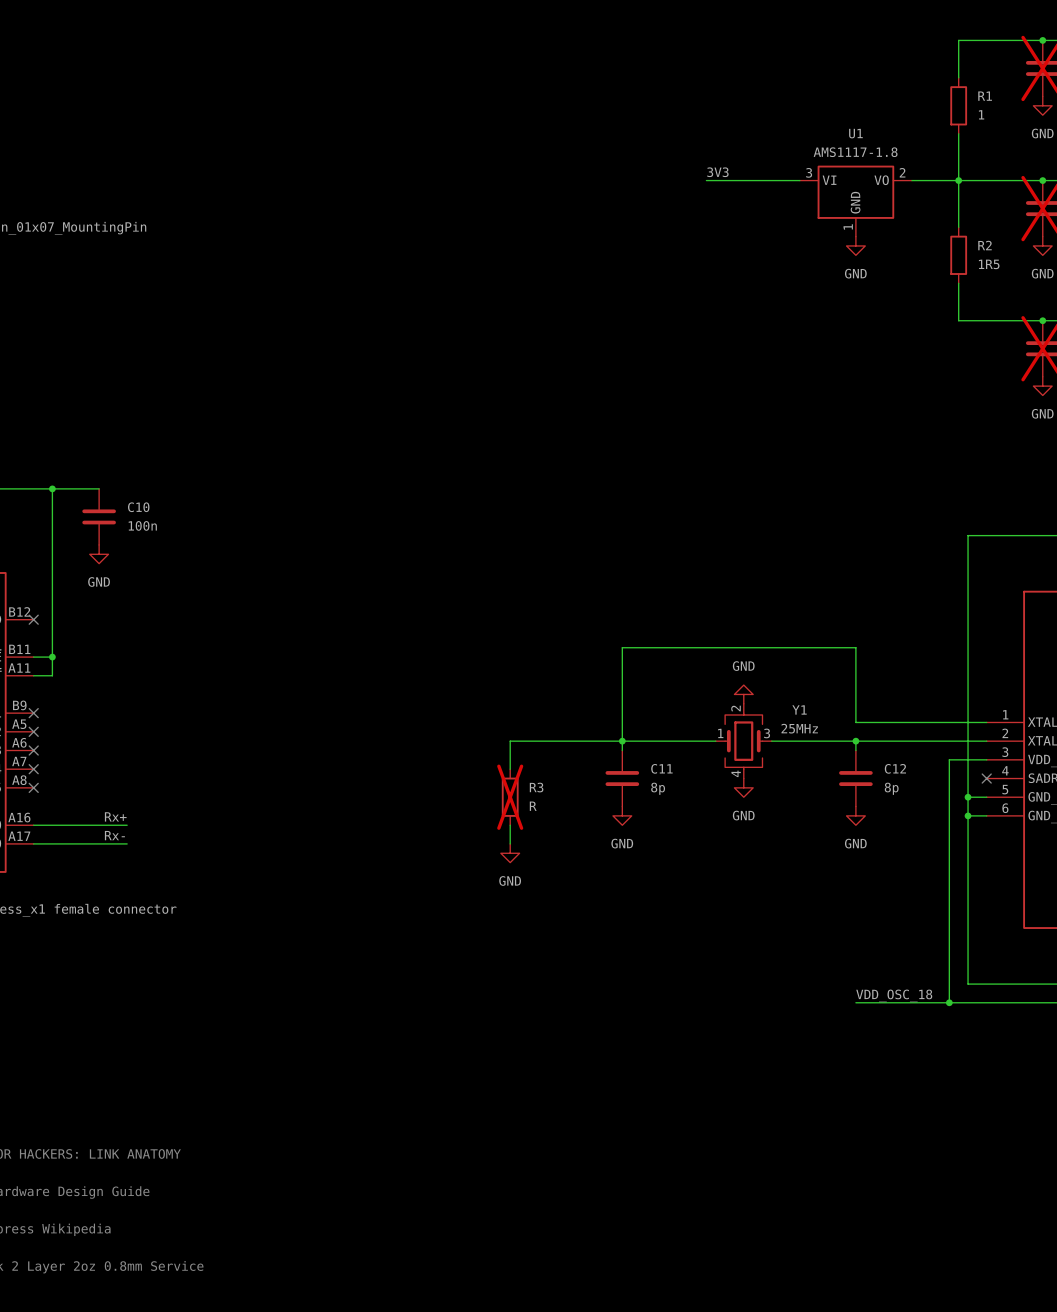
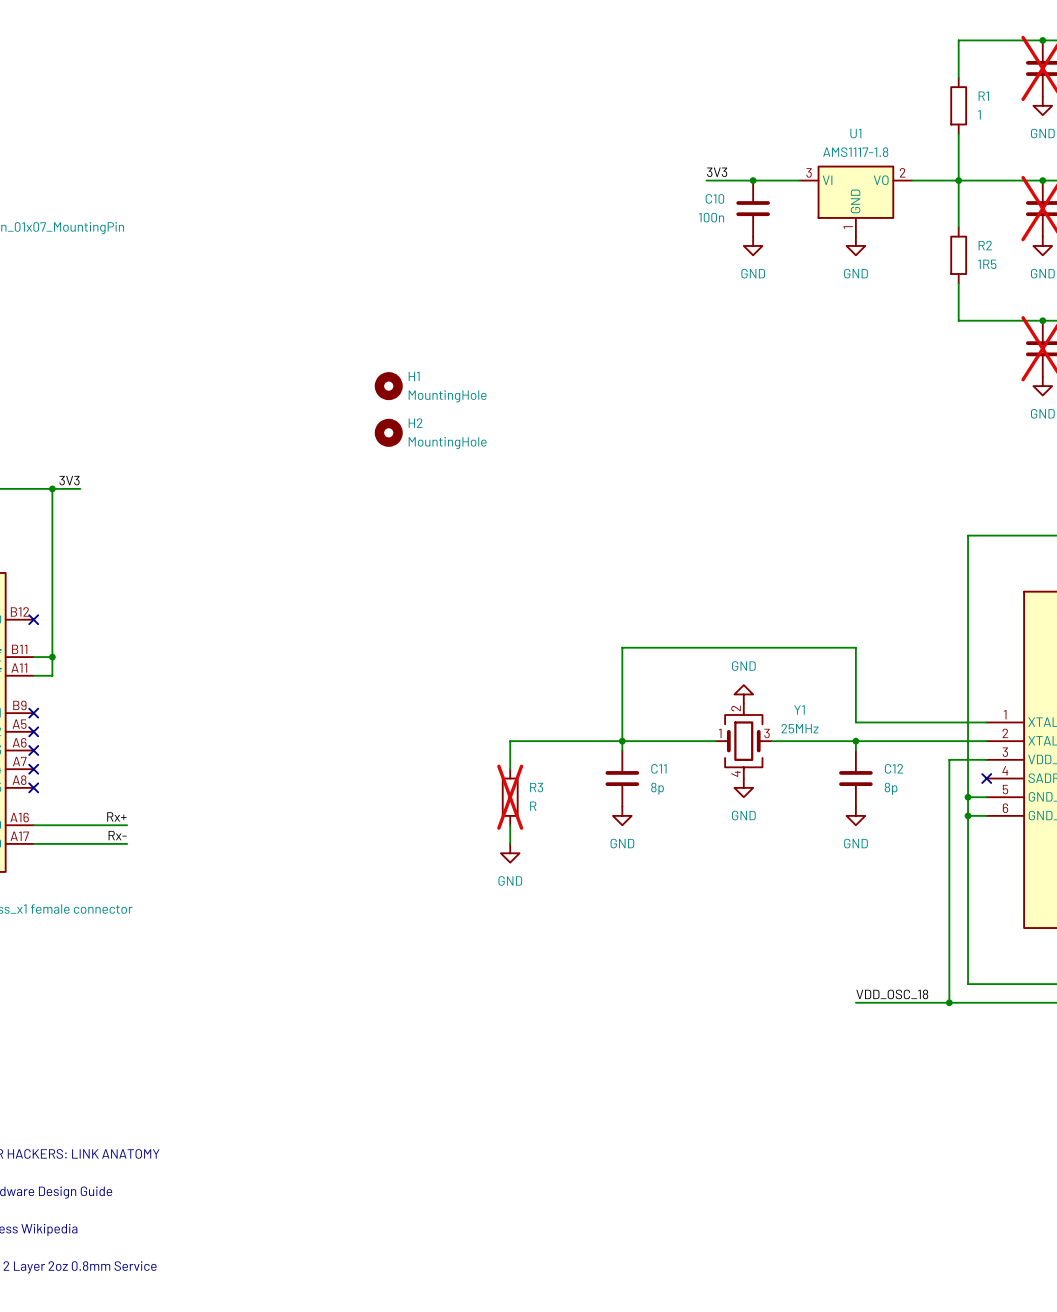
junction: none -> (753, 180)
power symbol: none -> GND (753, 245)
H1: none -> MountingHole (388, 386)
H2: none -> MountingHole (388, 432)
label: none -> 3V3 (69, 480)
wire: (80, 488) (99, 488) -> none
C10 name position: C10 (138, 507) -> C10 (714, 198)
C10 position: (99, 516) -> (753, 208)
C10 value position: 100n (142, 525) -> 100n (711, 217)
power symbol: GND (99, 554) -> none

